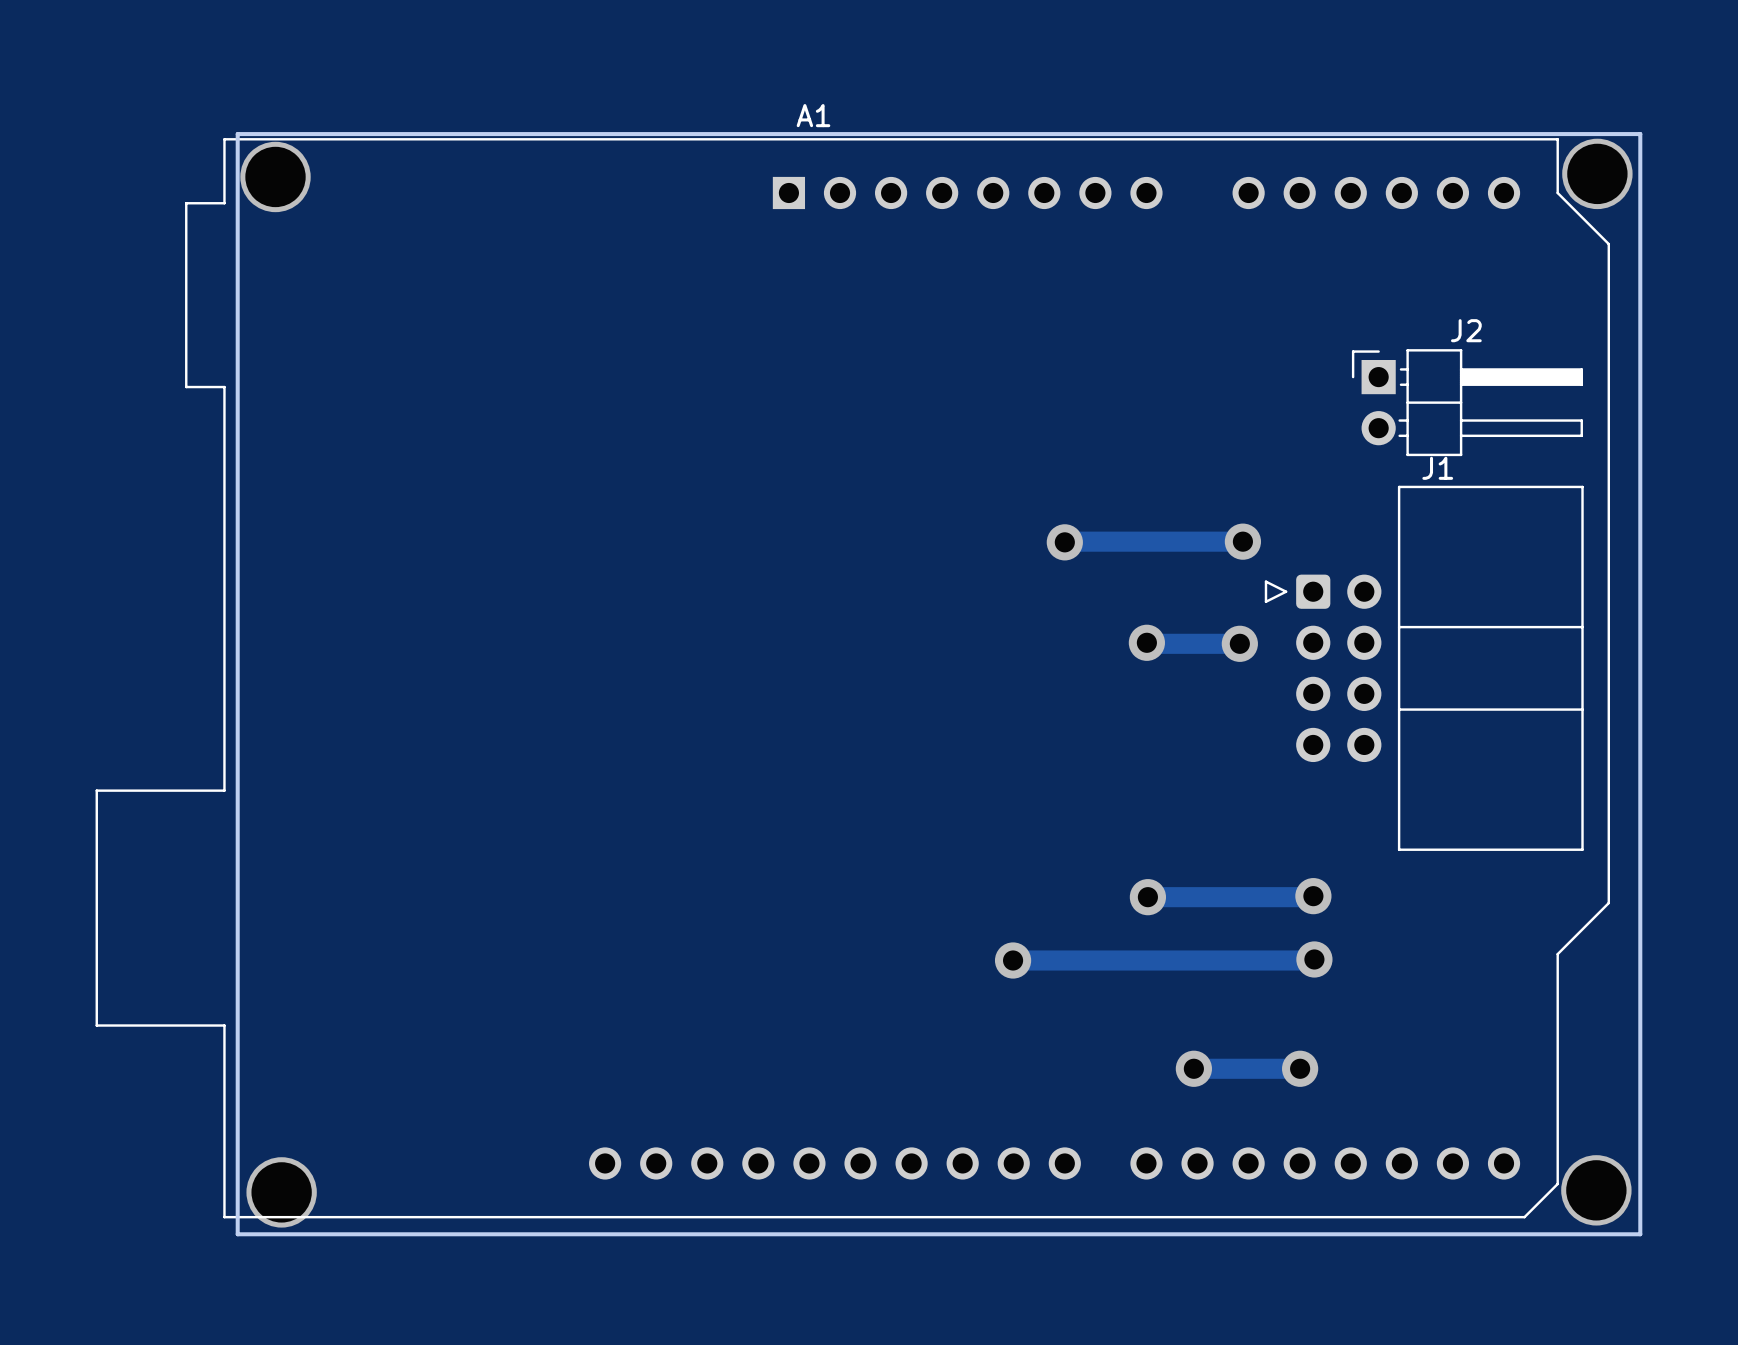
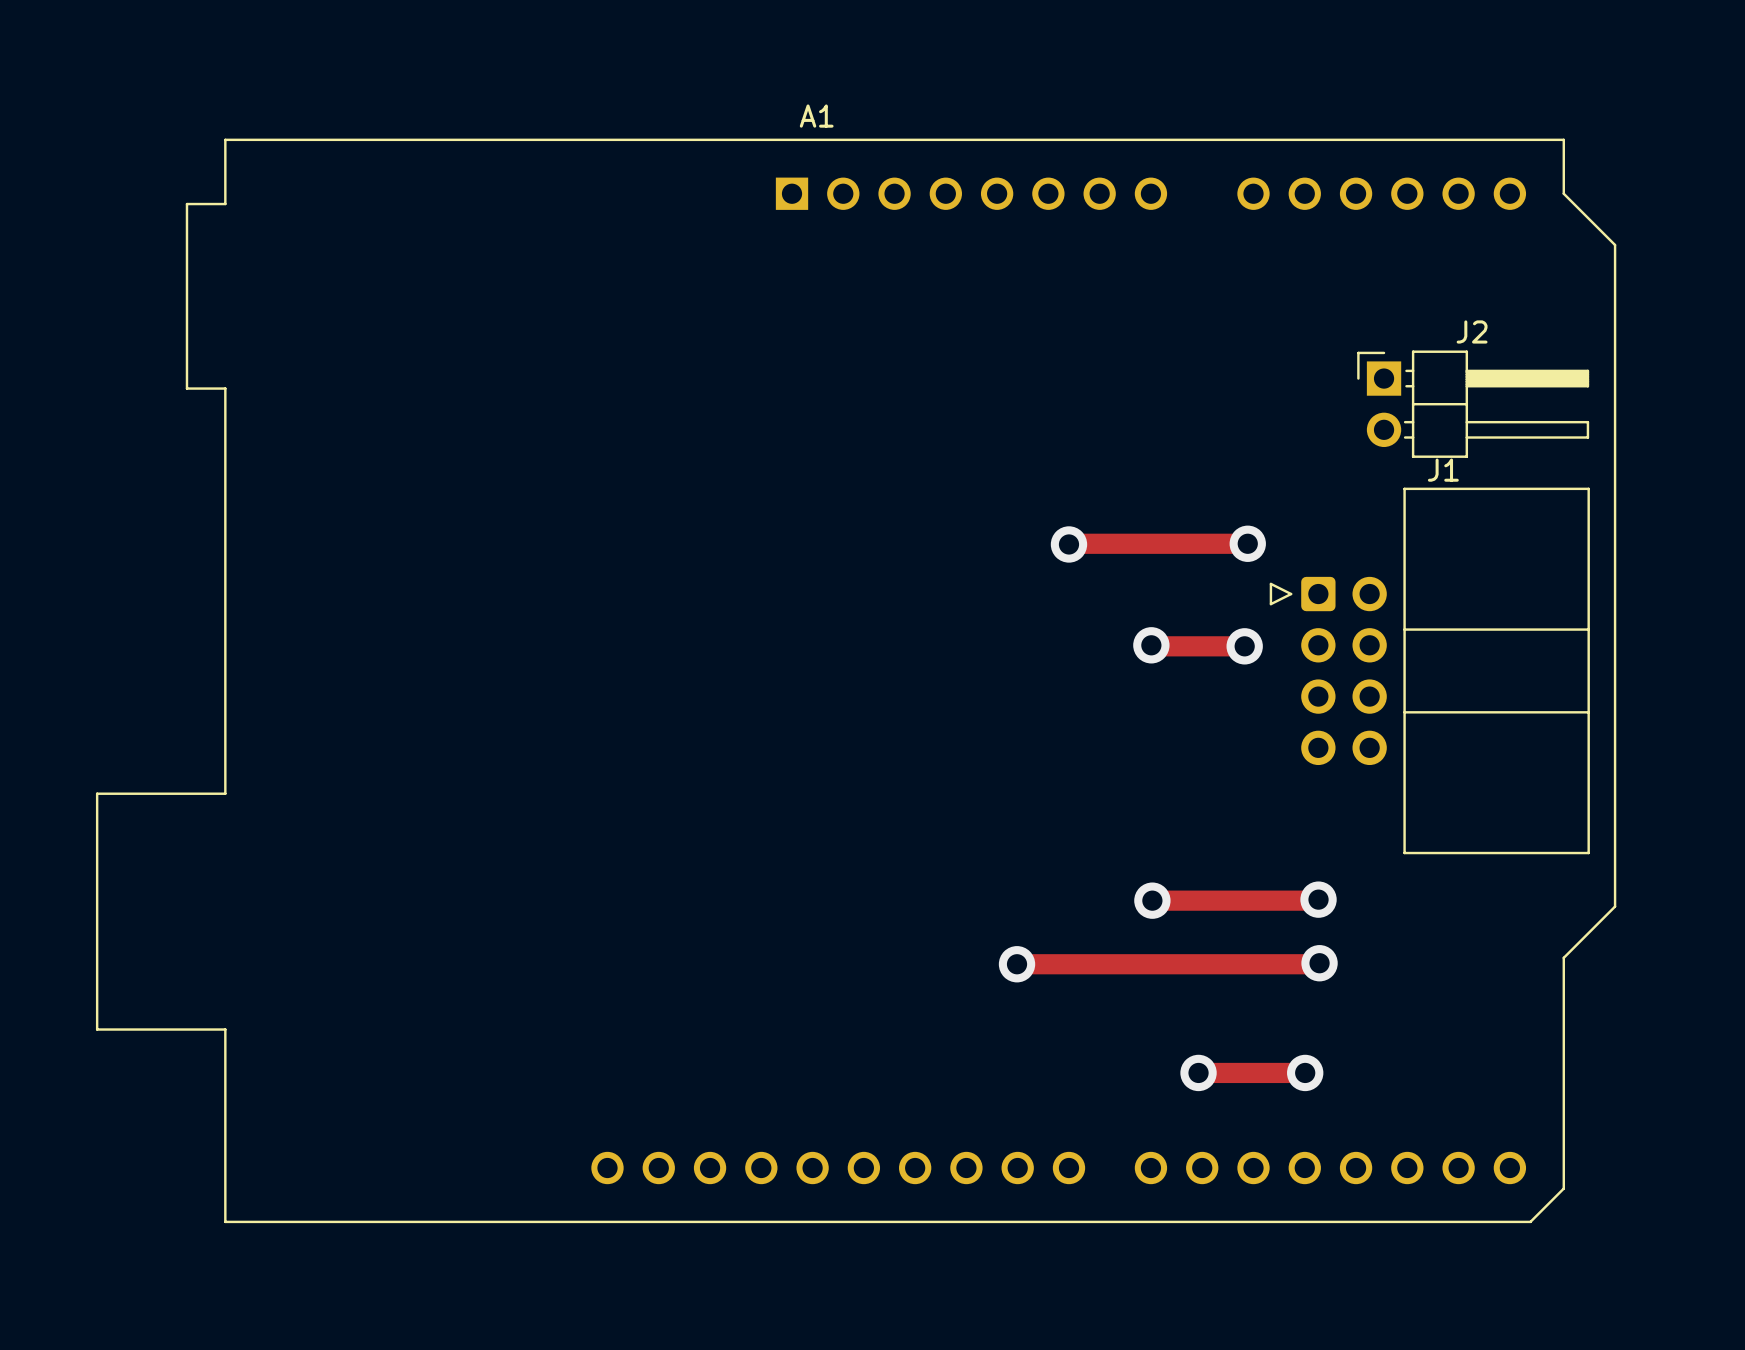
board edge: (237, 134) (1640, 134) (1640, 1234) (237, 1234) (237, 134) -> none
via: (1597, 173) -> none
via: (275, 176) -> none
via: (1596, 1190) -> none
via: (281, 1192) -> none

